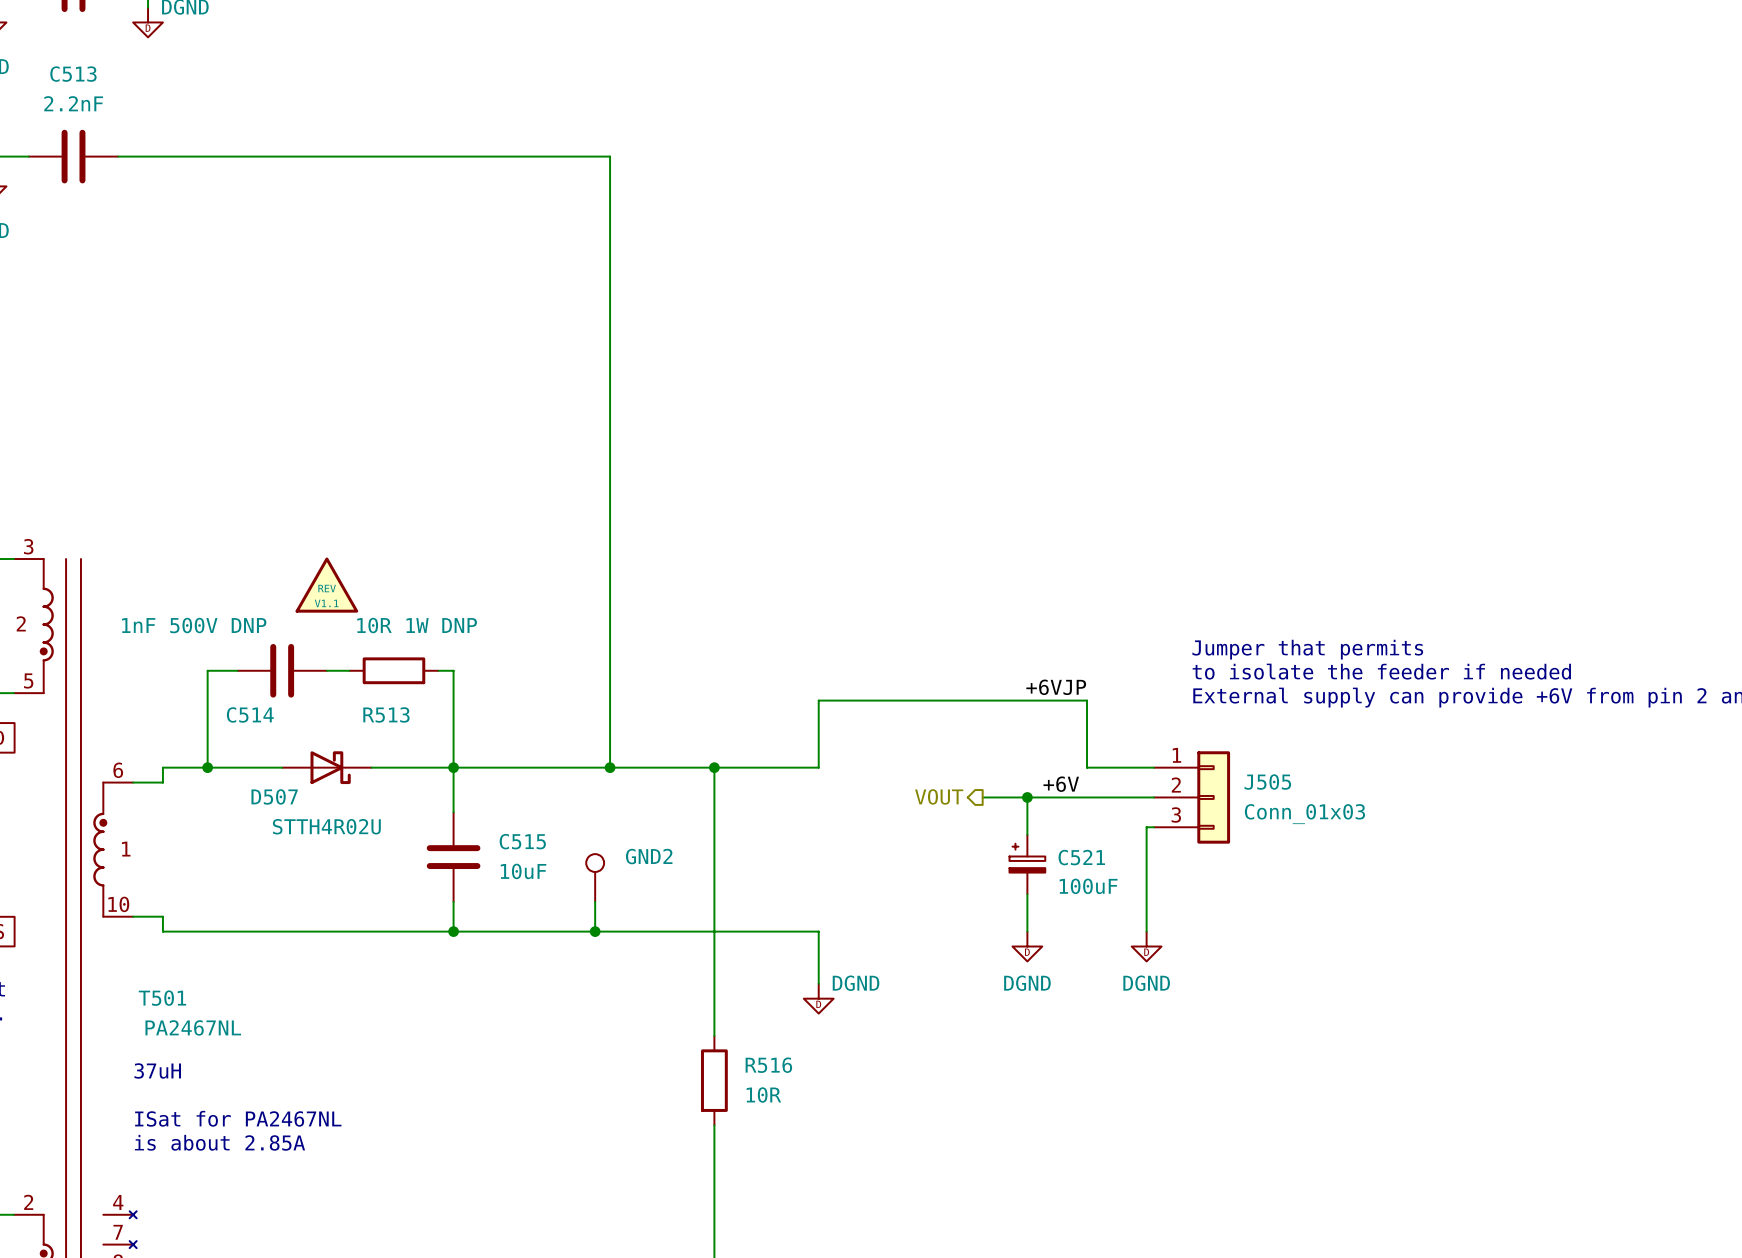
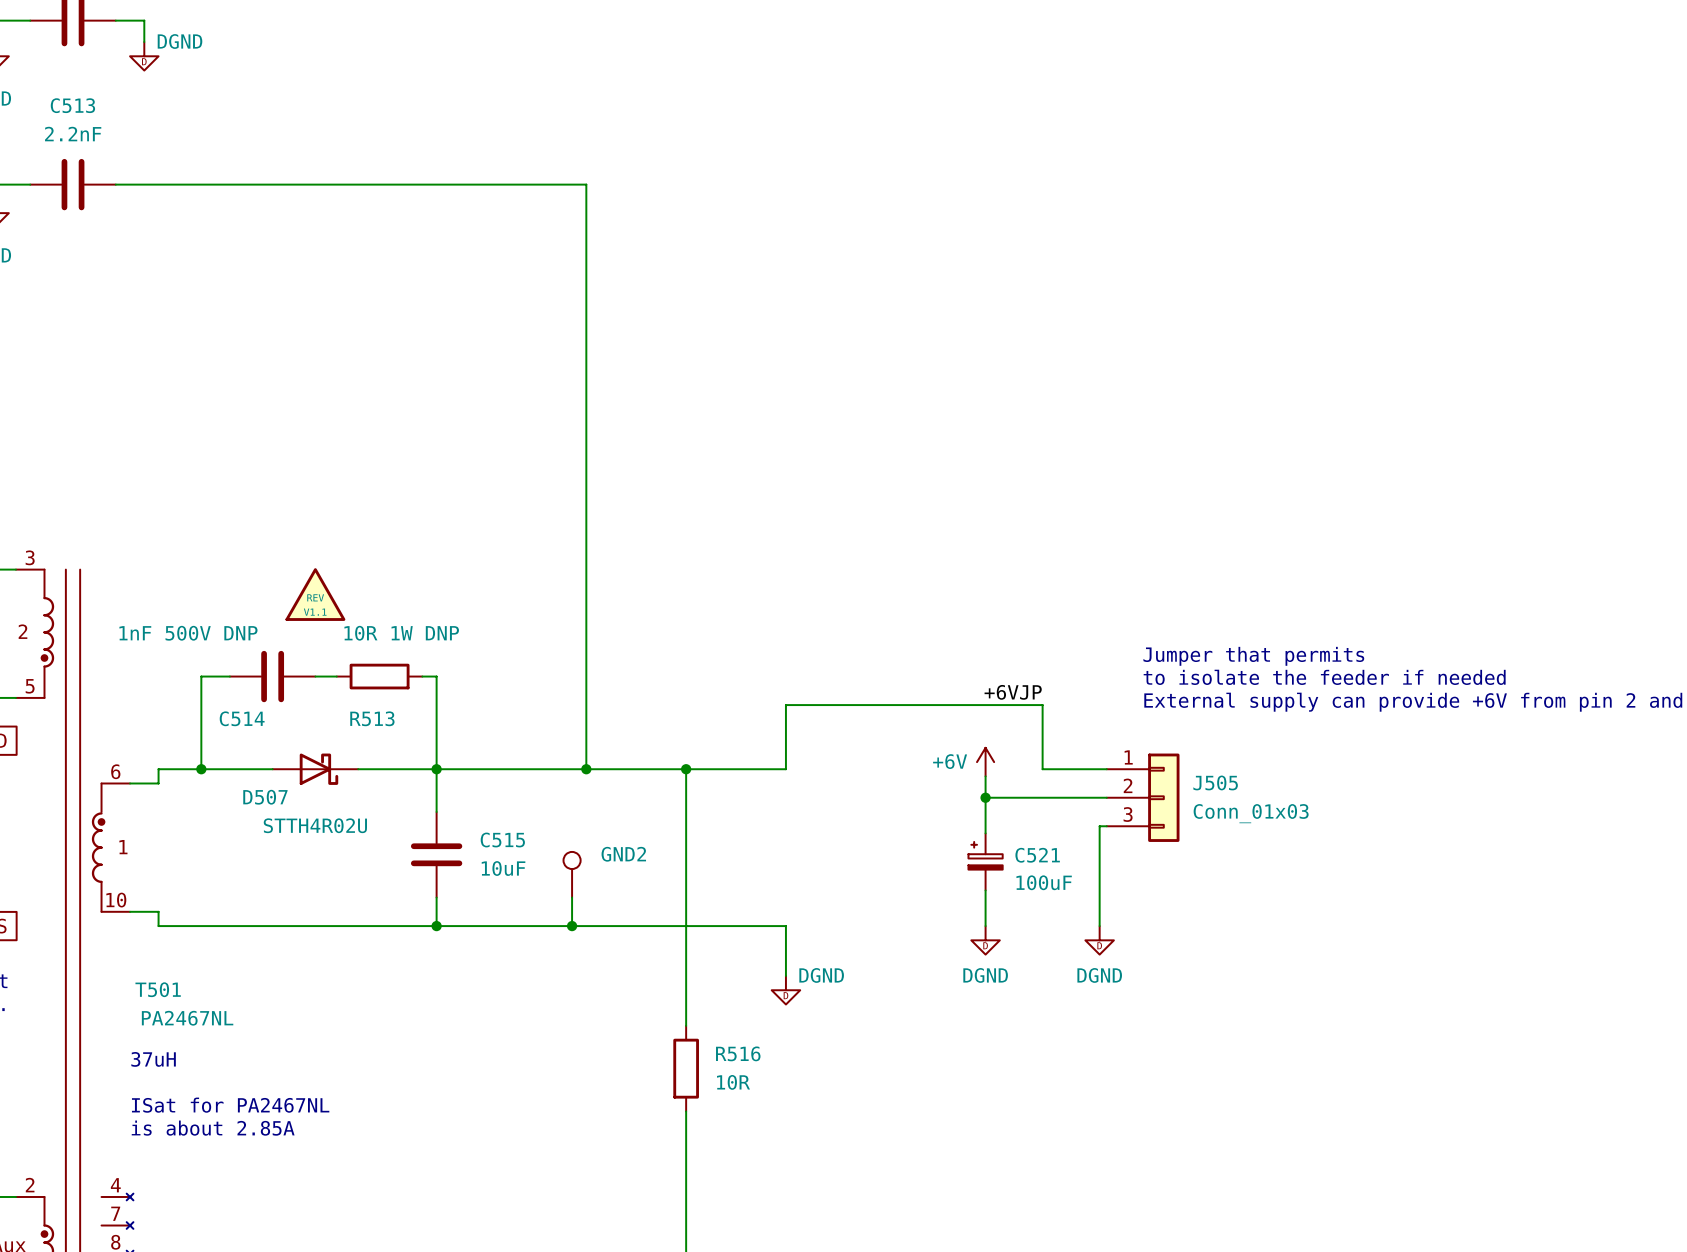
power symbol: none -> +6V (985, 762)
label: +6V (1061, 784) -> none
hierarchical label: VOUT (939, 796) -> none
wire: (982, 797) (1027, 797) -> (985, 776) (985, 797)

